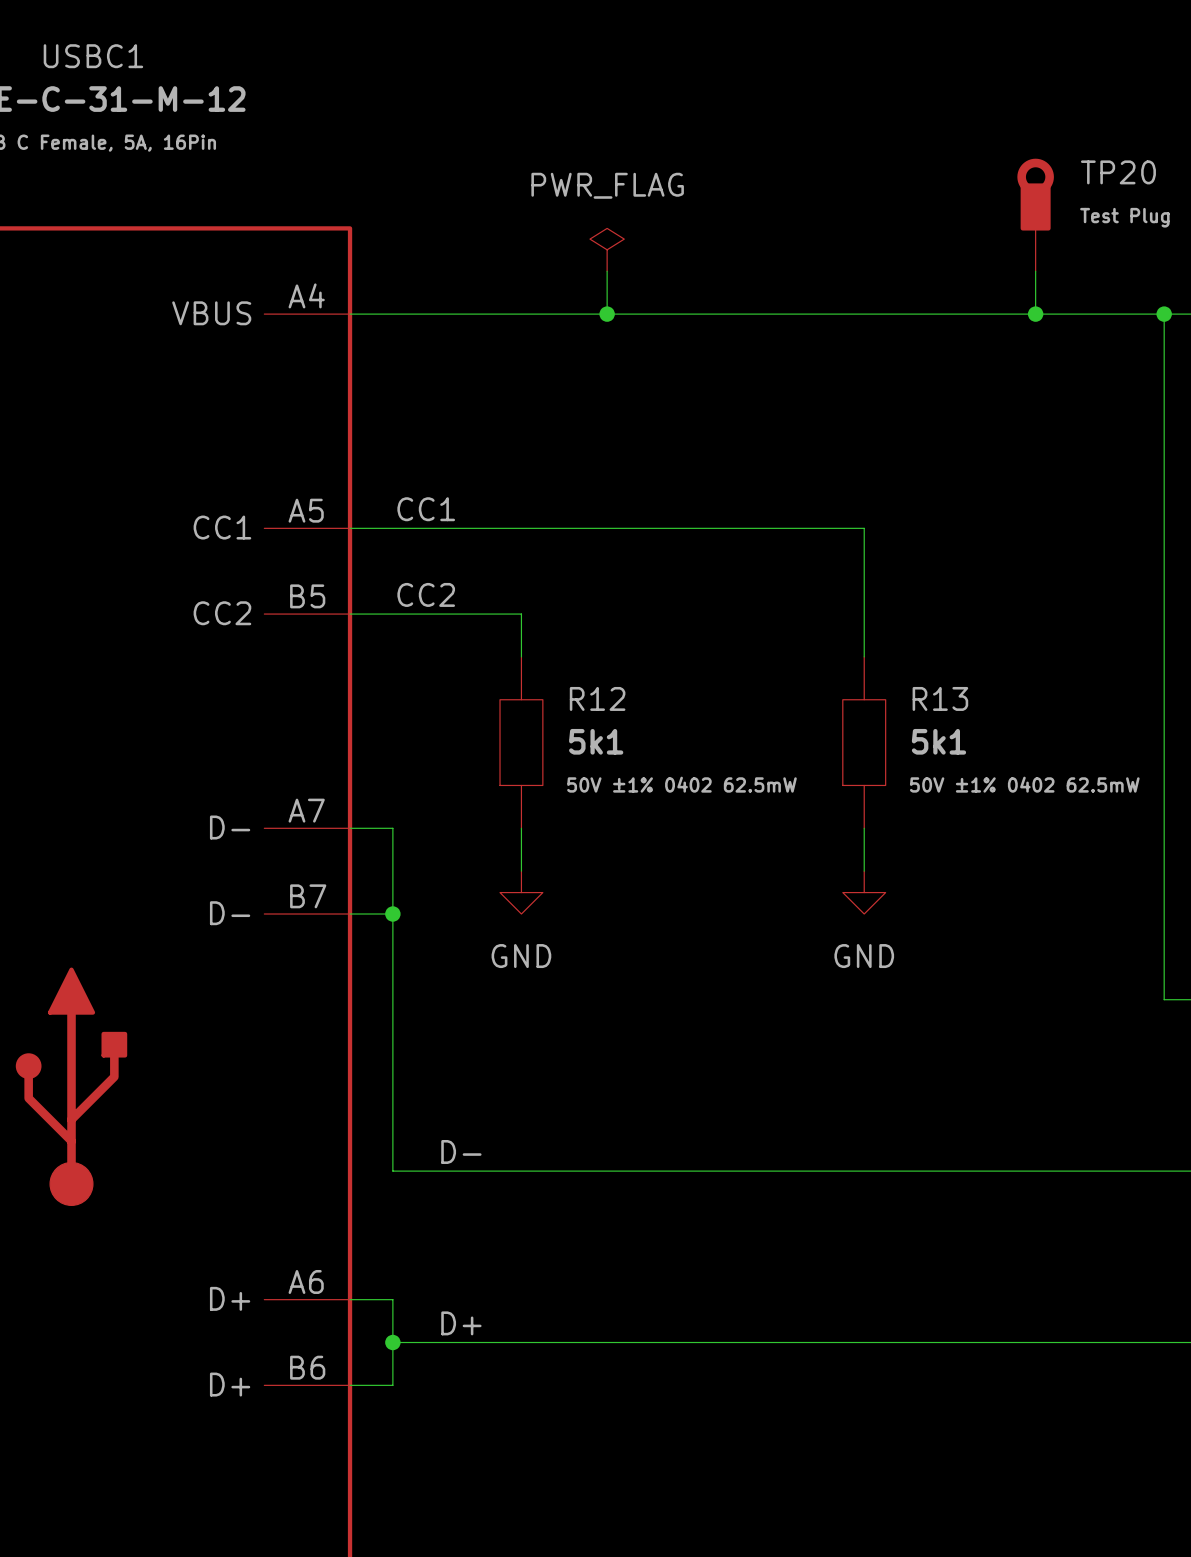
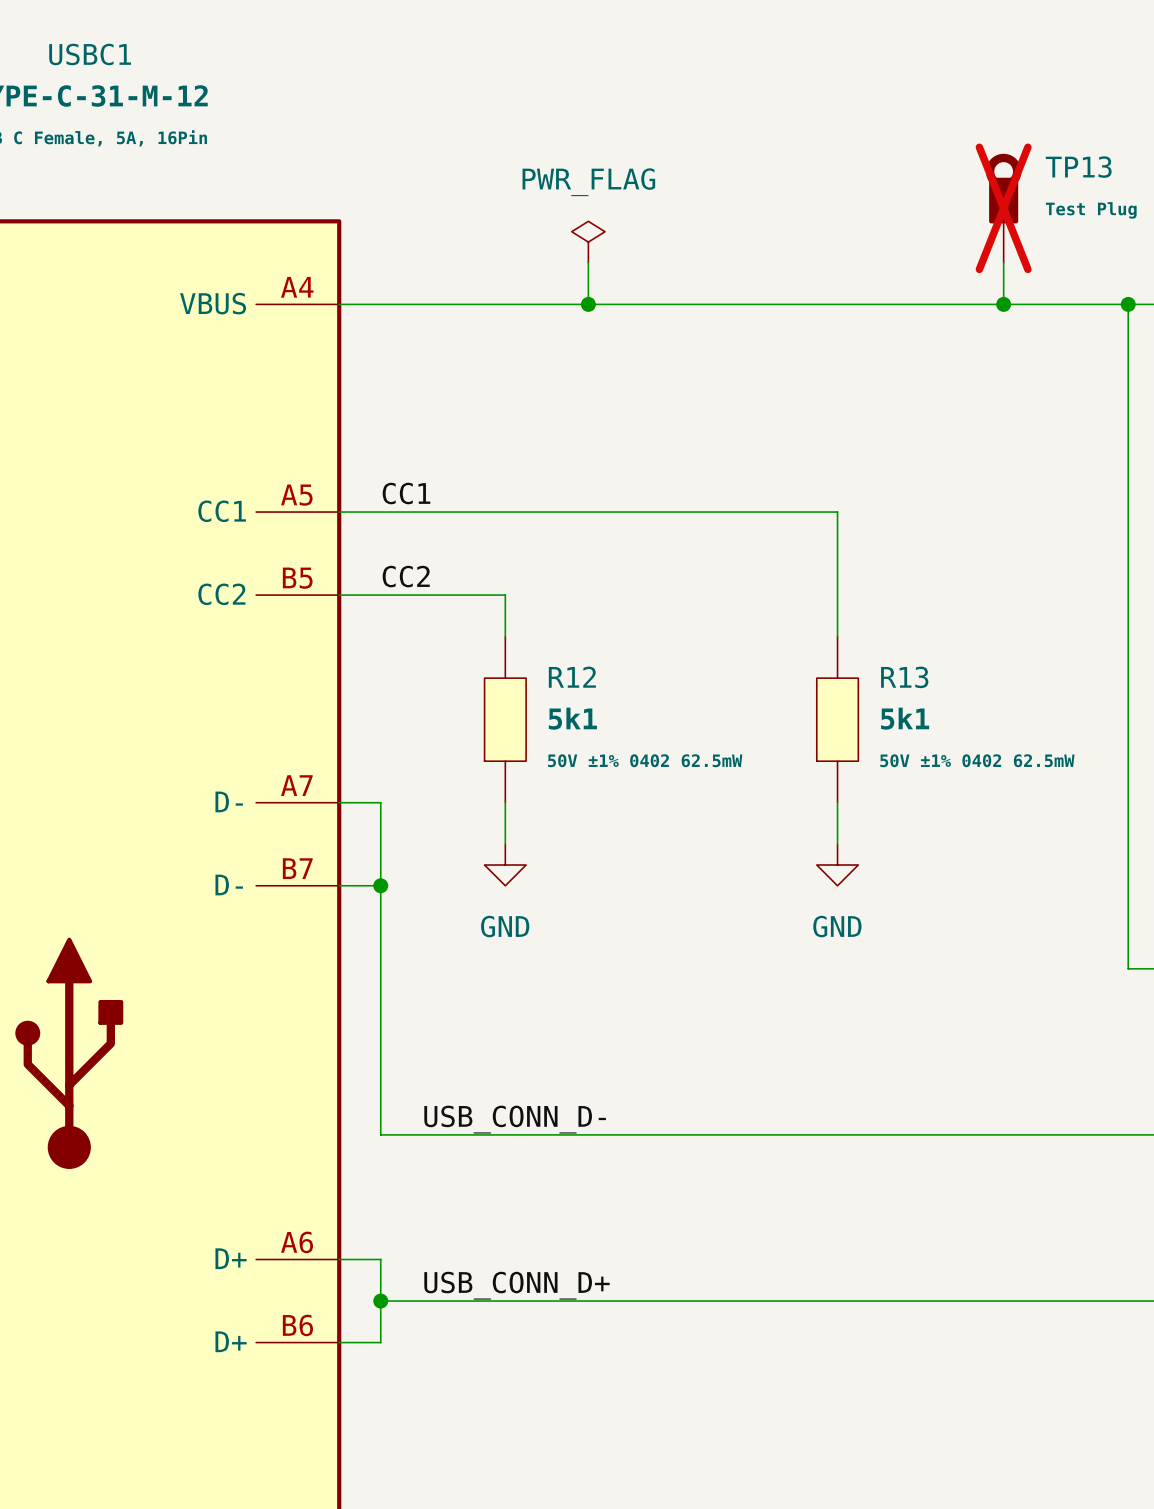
TP20 name: TP20 (1118, 172) -> TP13 (1078, 167)
TP20 do-not-place cross: none -> (1003, 208)
label: D- (461, 1151) -> USB_CONN_D- (515, 1119)
label: D+ (461, 1323) -> USB_CONN_D+ (516, 1285)

